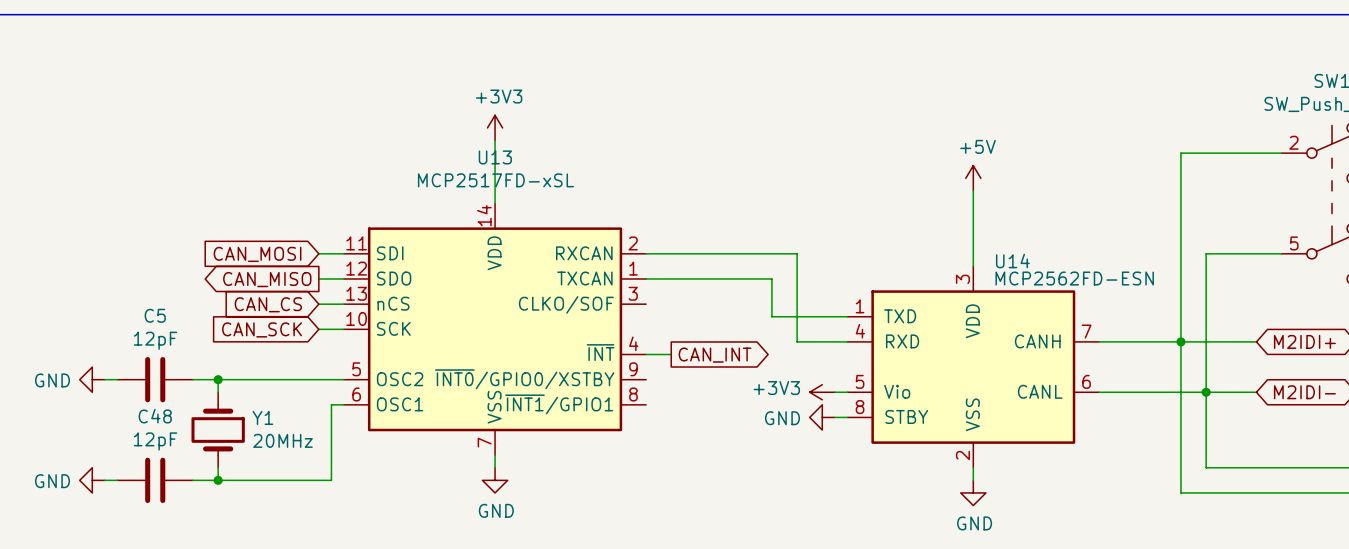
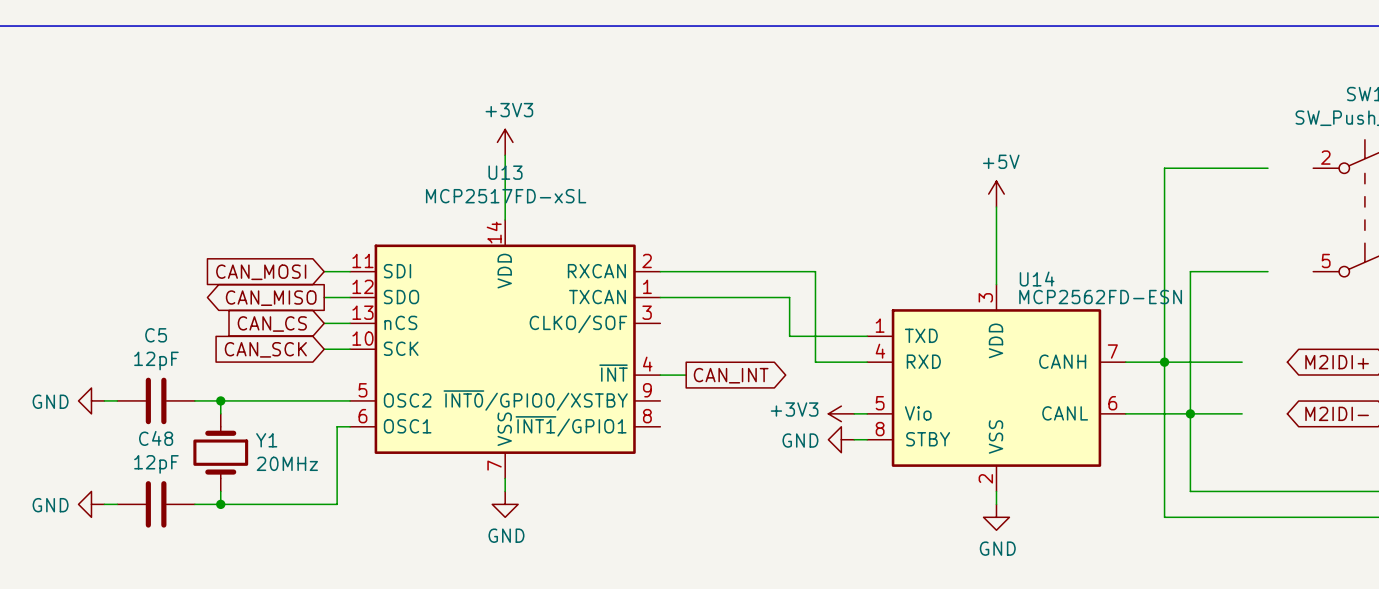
wire: (1180, 153) (1180, 492) -> (1209, 168) (1164, 168) (1164, 517) (1209, 517)
wire: (1237, 153) (1281, 153) -> none
wire: (1206, 253) (1206, 467) -> (1235, 271) (1190, 271) (1190, 491) (1235, 491)
wire: (1237, 253) (1281, 253) -> none
junction: none -> (1164, 362)
junction: (1180, 341) -> none
wire: (1212, 341) (1256, 341) -> none
junction: none -> (1190, 413)
junction: (1206, 392) -> none
wire: (1212, 392) (1256, 392) -> none

